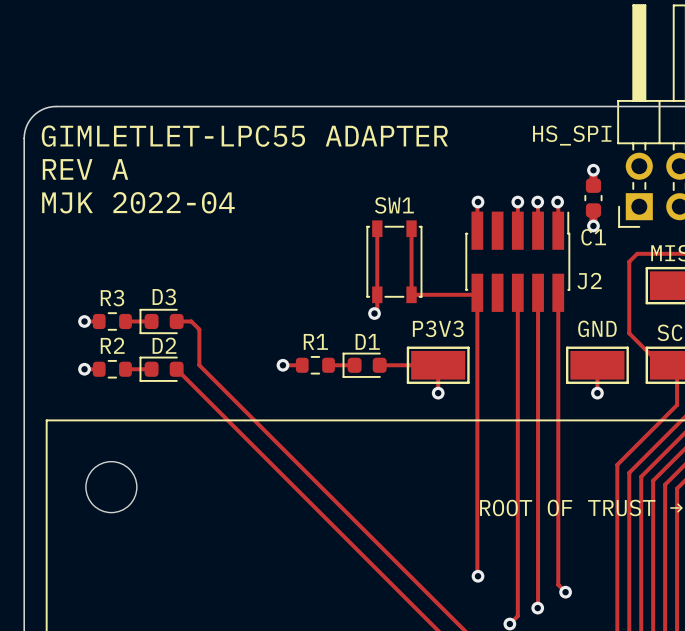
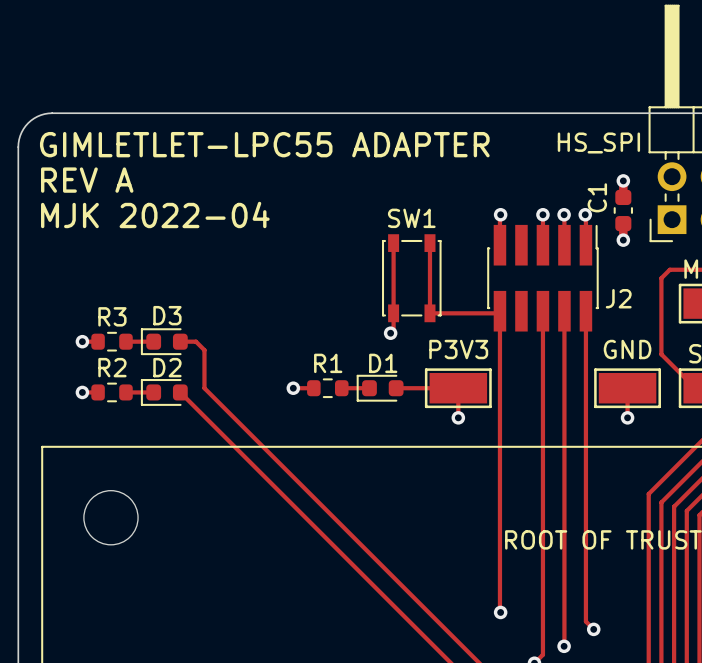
C1 name rotation: 0° (593, 237) -> 90° counterclockwise (597, 197)
C1 name position: C1 (593, 237) -> C1 (597, 197)

